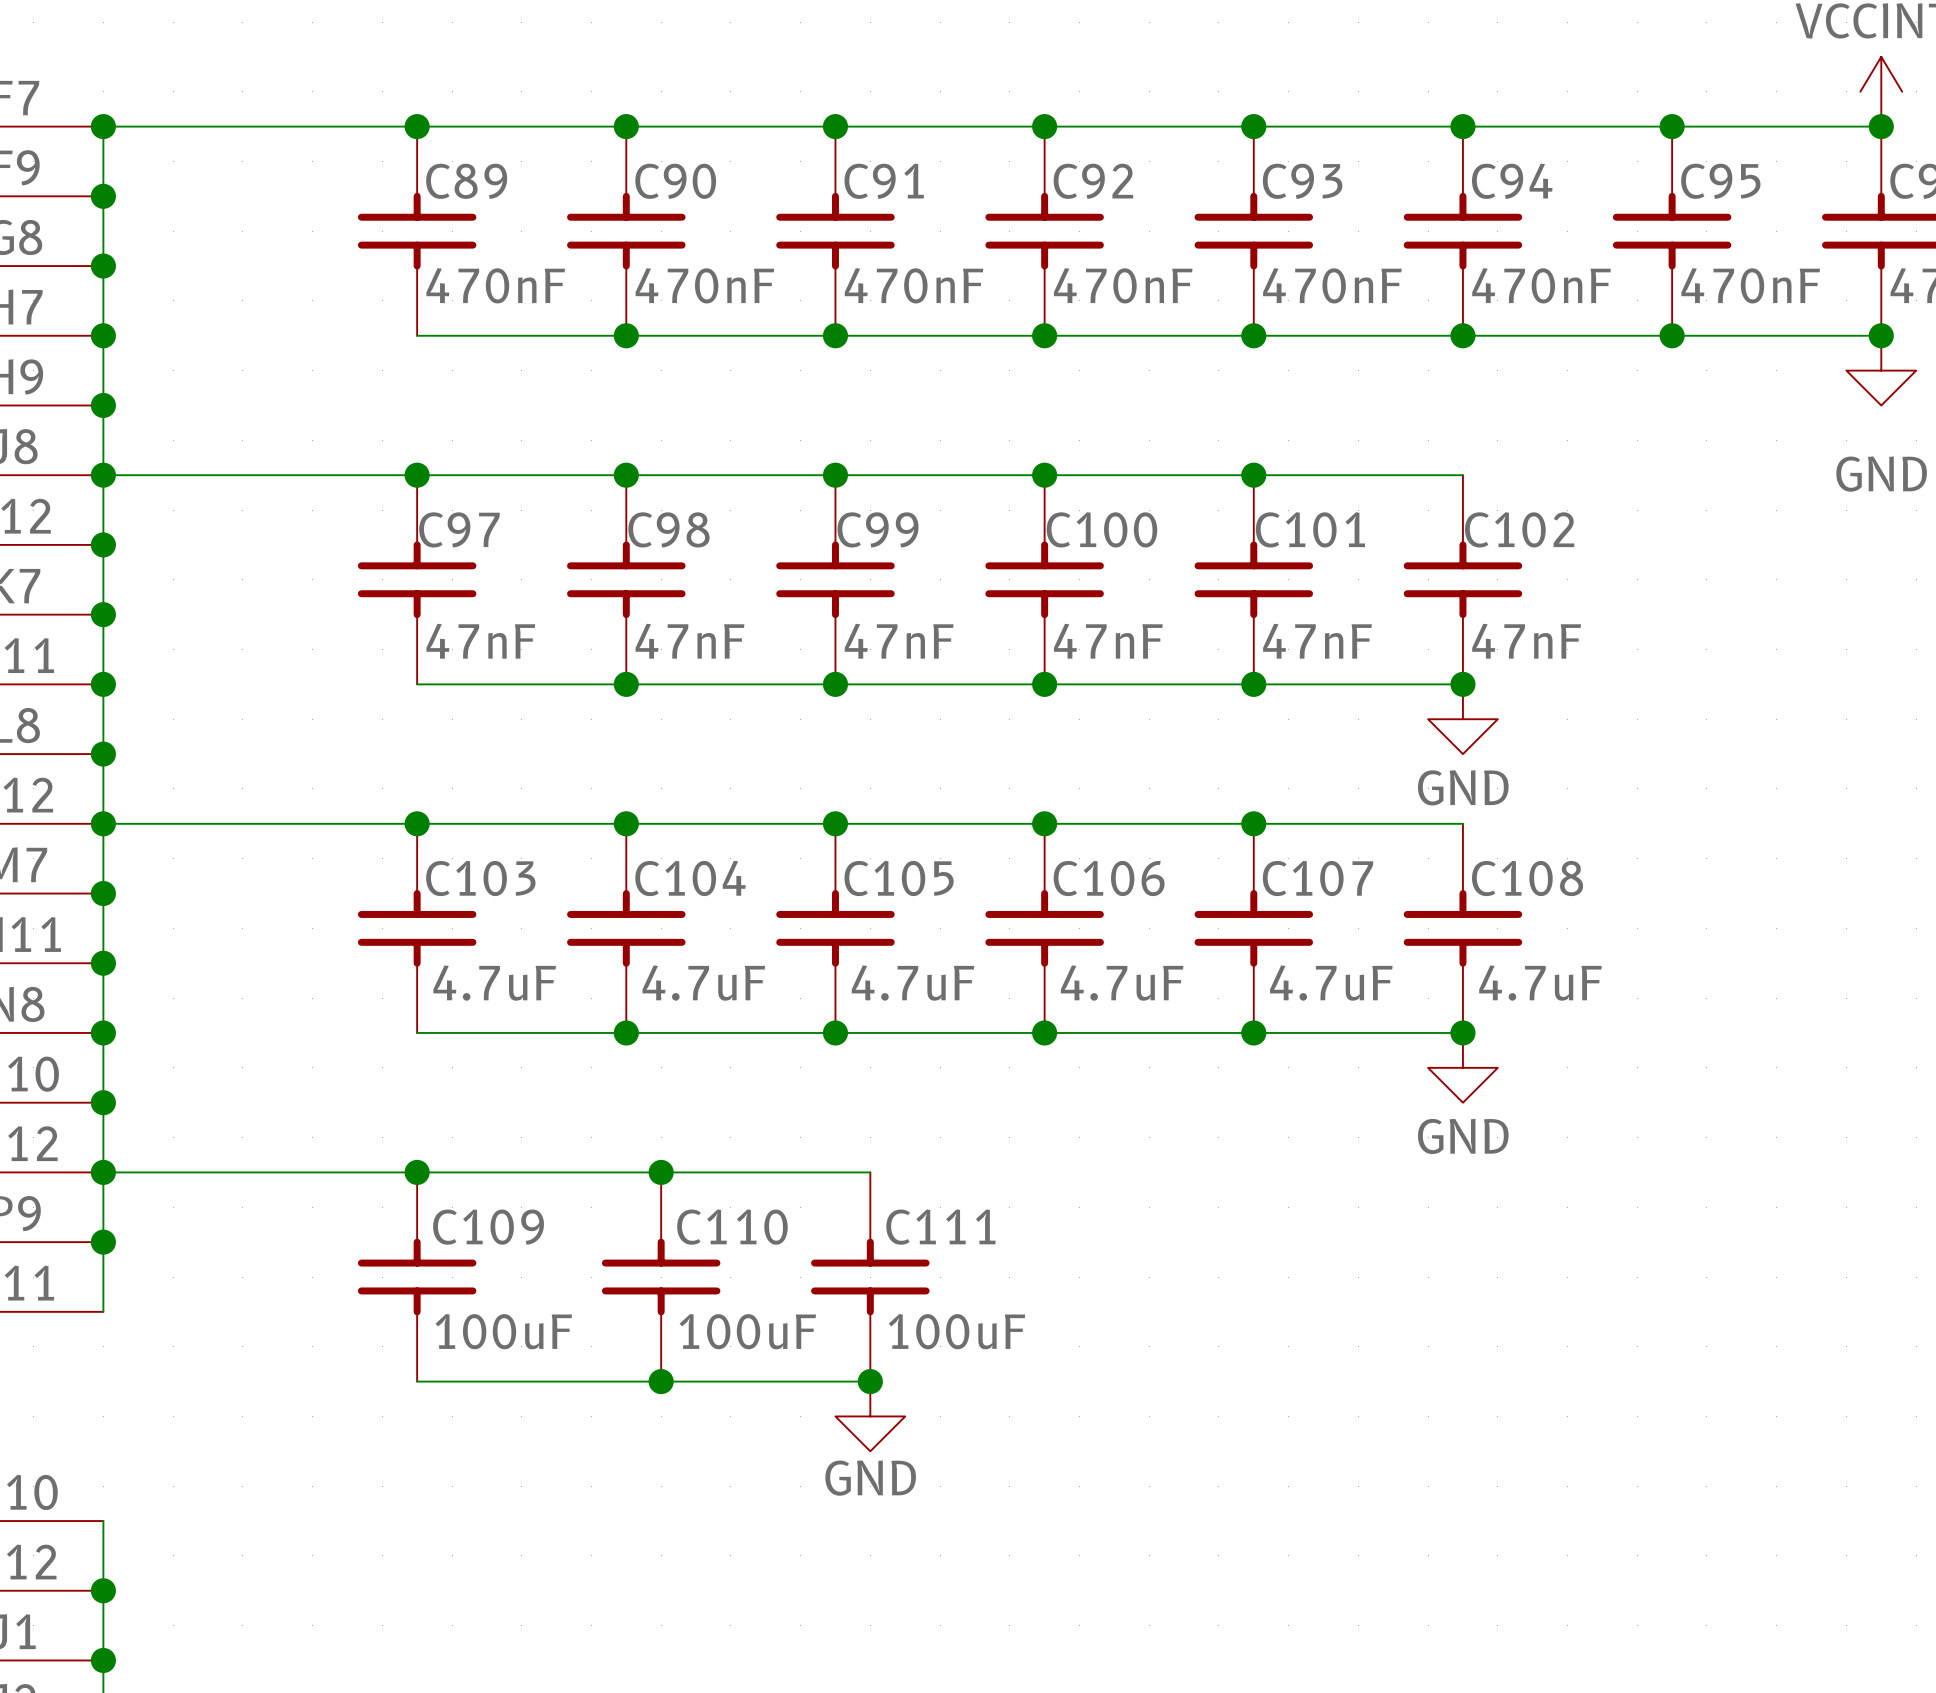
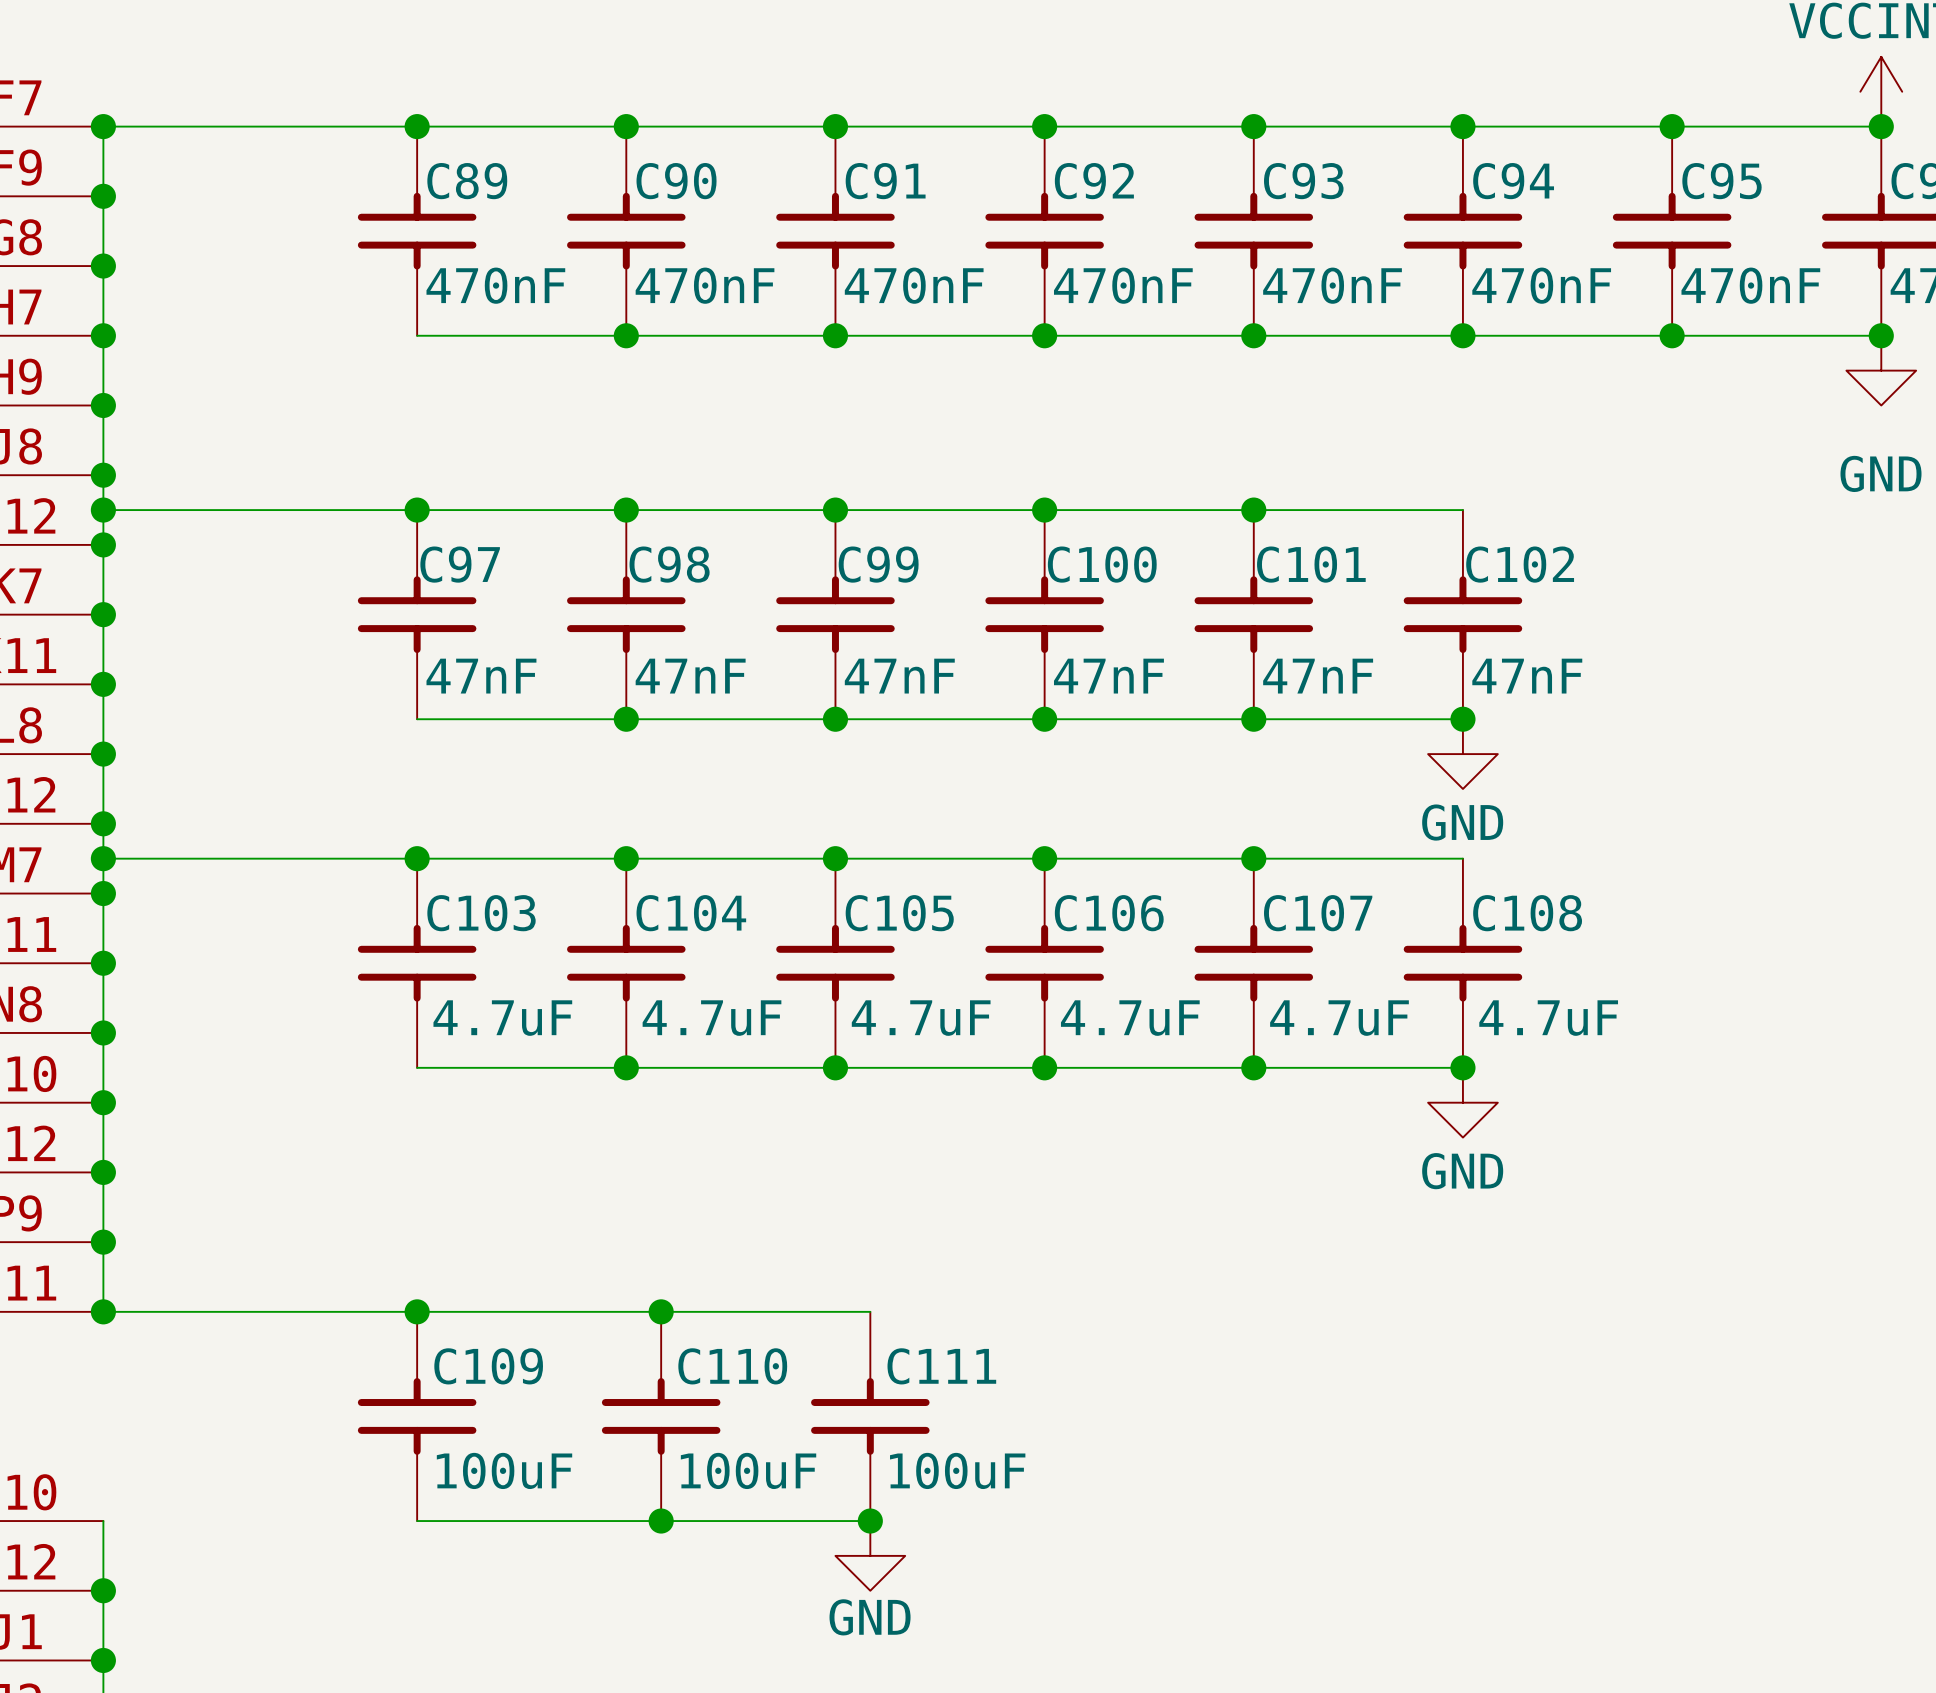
wire: (103, 475) (1462, 475) -> (103, 510) (1462, 510)
junction position: (417, 475) -> (417, 510)
junction position: (626, 475) -> (626, 510)
junction position: (835, 475) -> (835, 510)
junction position: (1044, 475) -> (1044, 510)
junction position: (1253, 475) -> (1253, 510)
junction: none -> (103, 510)
C97 position: (417, 579) -> (417, 614)
C98 position: (626, 579) -> (626, 614)
C99 position: (835, 579) -> (835, 614)
C100 position: (1044, 579) -> (1044, 614)
C101 position: (1253, 579) -> (1253, 614)
C102 position: (1462, 579) -> (1462, 614)
wire: (417, 684) (1462, 684) -> (417, 719) (1462, 719)
junction position: (626, 684) -> (626, 719)
junction position: (835, 684) -> (835, 719)
junction position: (1044, 684) -> (1044, 719)
junction position: (1253, 684) -> (1253, 719)
junction position: (1462, 684) -> (1462, 719)
power symbol position: GND (1462, 719) -> GND (1462, 754)
wire: (103, 823) (1462, 823) -> (103, 858) (1462, 858)
junction position: (417, 823) -> (417, 858)
junction position: (626, 823) -> (626, 858)
junction position: (835, 823) -> (835, 858)
junction position: (1044, 823) -> (1044, 858)
junction position: (1253, 823) -> (1253, 858)
junction: none -> (103, 858)
C103 position: (417, 928) -> (417, 963)
C104 position: (626, 928) -> (626, 963)
C105 position: (835, 928) -> (835, 963)
C106 position: (1044, 928) -> (1044, 963)
C107 position: (1253, 928) -> (1253, 963)
C108 position: (1462, 928) -> (1462, 963)
wire: (417, 1032) (1462, 1032) -> (417, 1067) (1462, 1067)
junction position: (626, 1032) -> (626, 1067)
junction position: (835, 1032) -> (835, 1067)
junction position: (1044, 1032) -> (1044, 1067)
junction position: (1253, 1032) -> (1253, 1067)
junction position: (1462, 1032) -> (1462, 1067)
power symbol position: GND (1462, 1067) -> GND (1462, 1102)
wire: (103, 1172) (870, 1172) -> (103, 1311) (870, 1311)
junction: (417, 1172) -> none
junction: (661, 1172) -> none
C109 position: (417, 1277) -> (417, 1416)
C110 position: (661, 1277) -> (661, 1416)
C111 position: (870, 1277) -> (870, 1416)
junction: none -> (103, 1311)
junction: none -> (417, 1311)
junction: none -> (661, 1311)
wire: (417, 1381) (870, 1381) -> (417, 1521) (870, 1521)
junction: (661, 1381) -> none
junction: (870, 1381) -> none
power symbol position: GND (870, 1416) -> GND (870, 1555)
junction: none -> (661, 1521)
junction: none -> (870, 1521)

